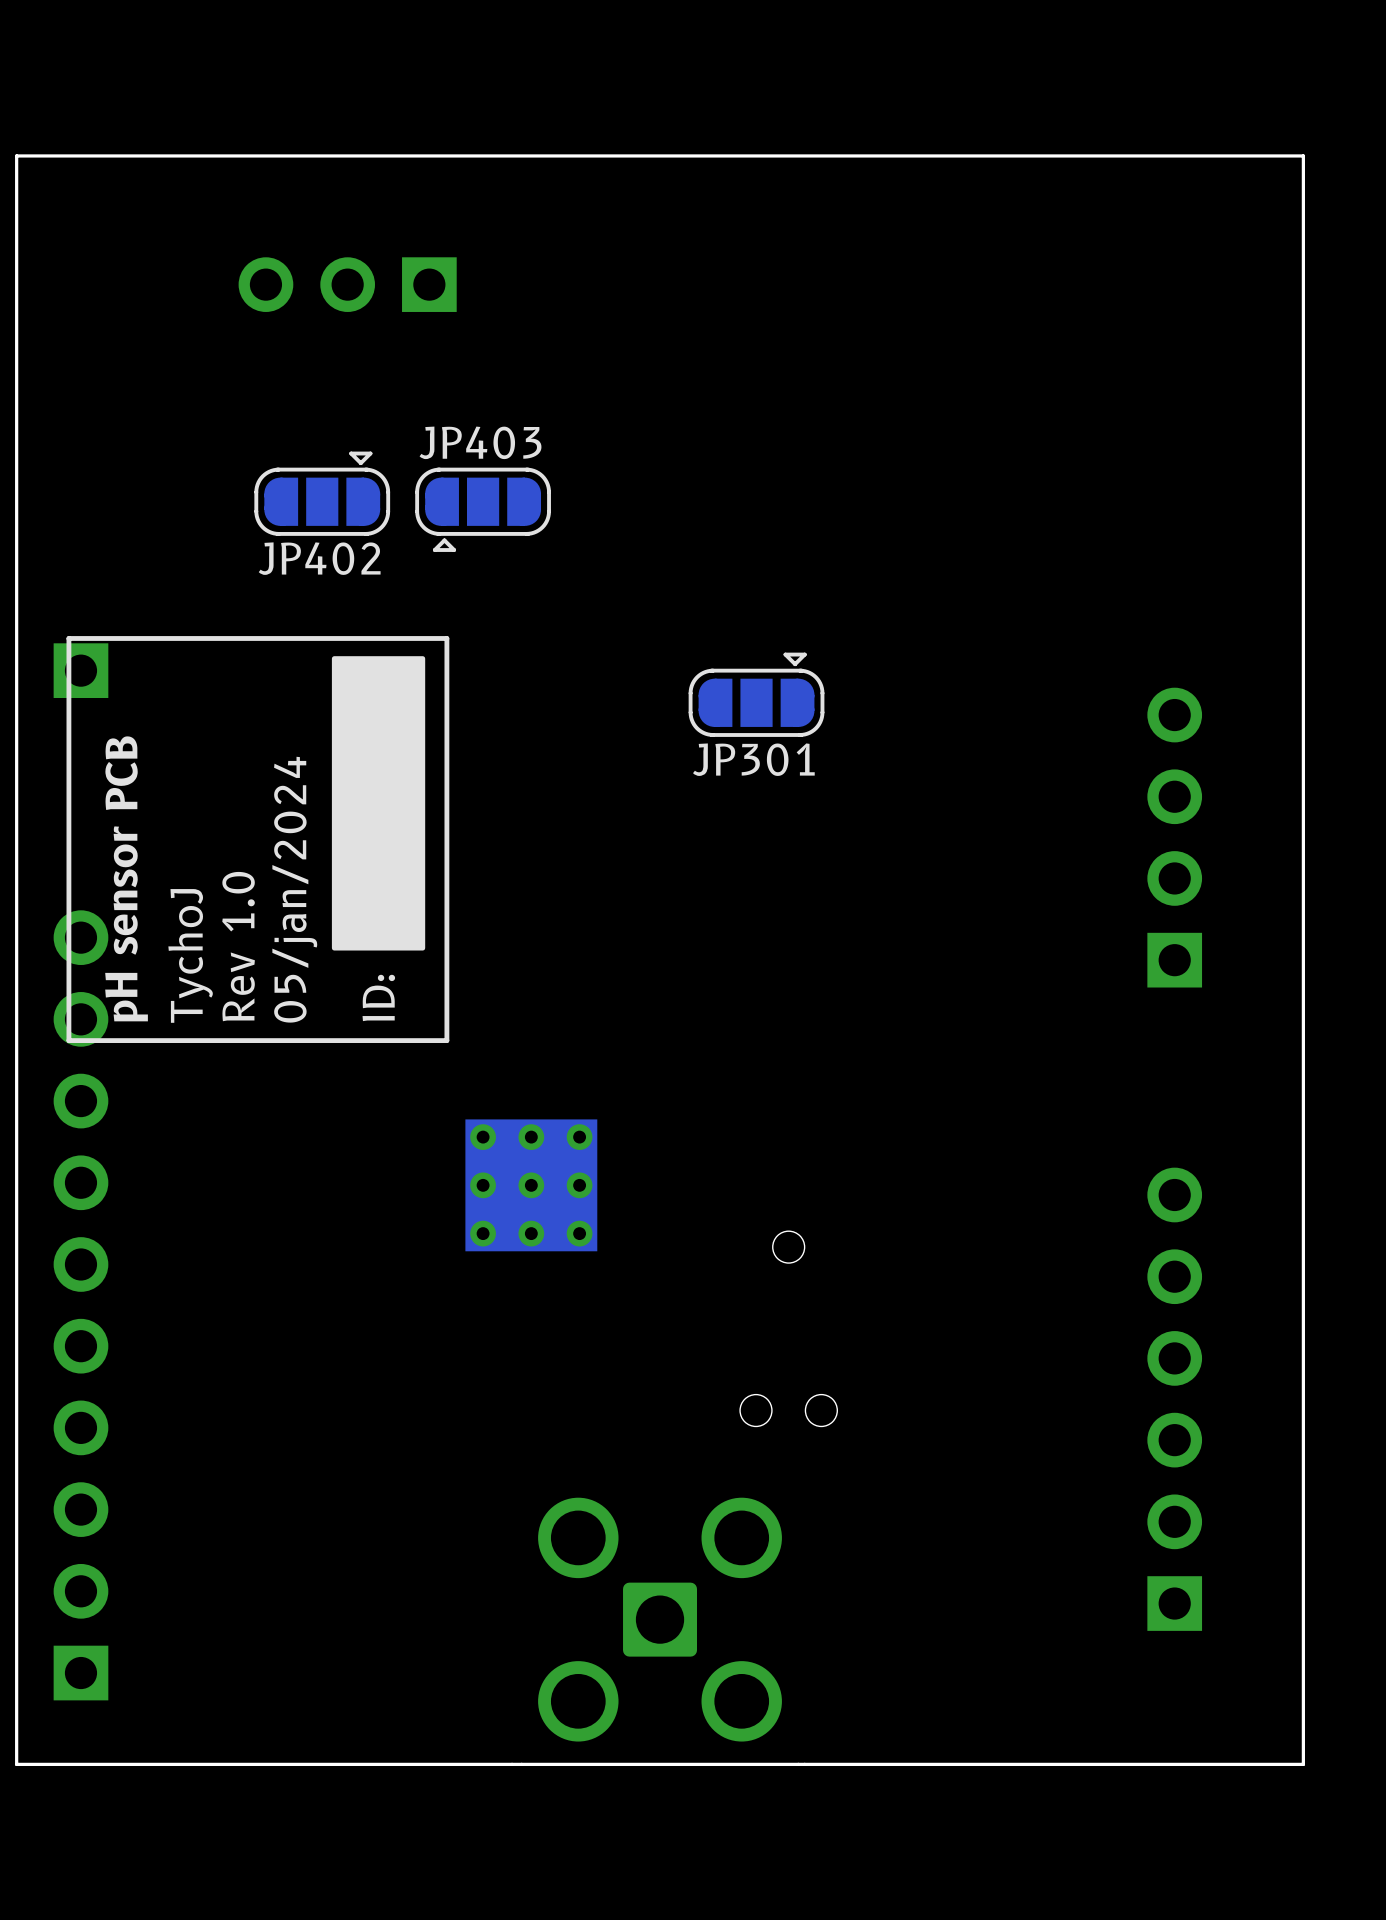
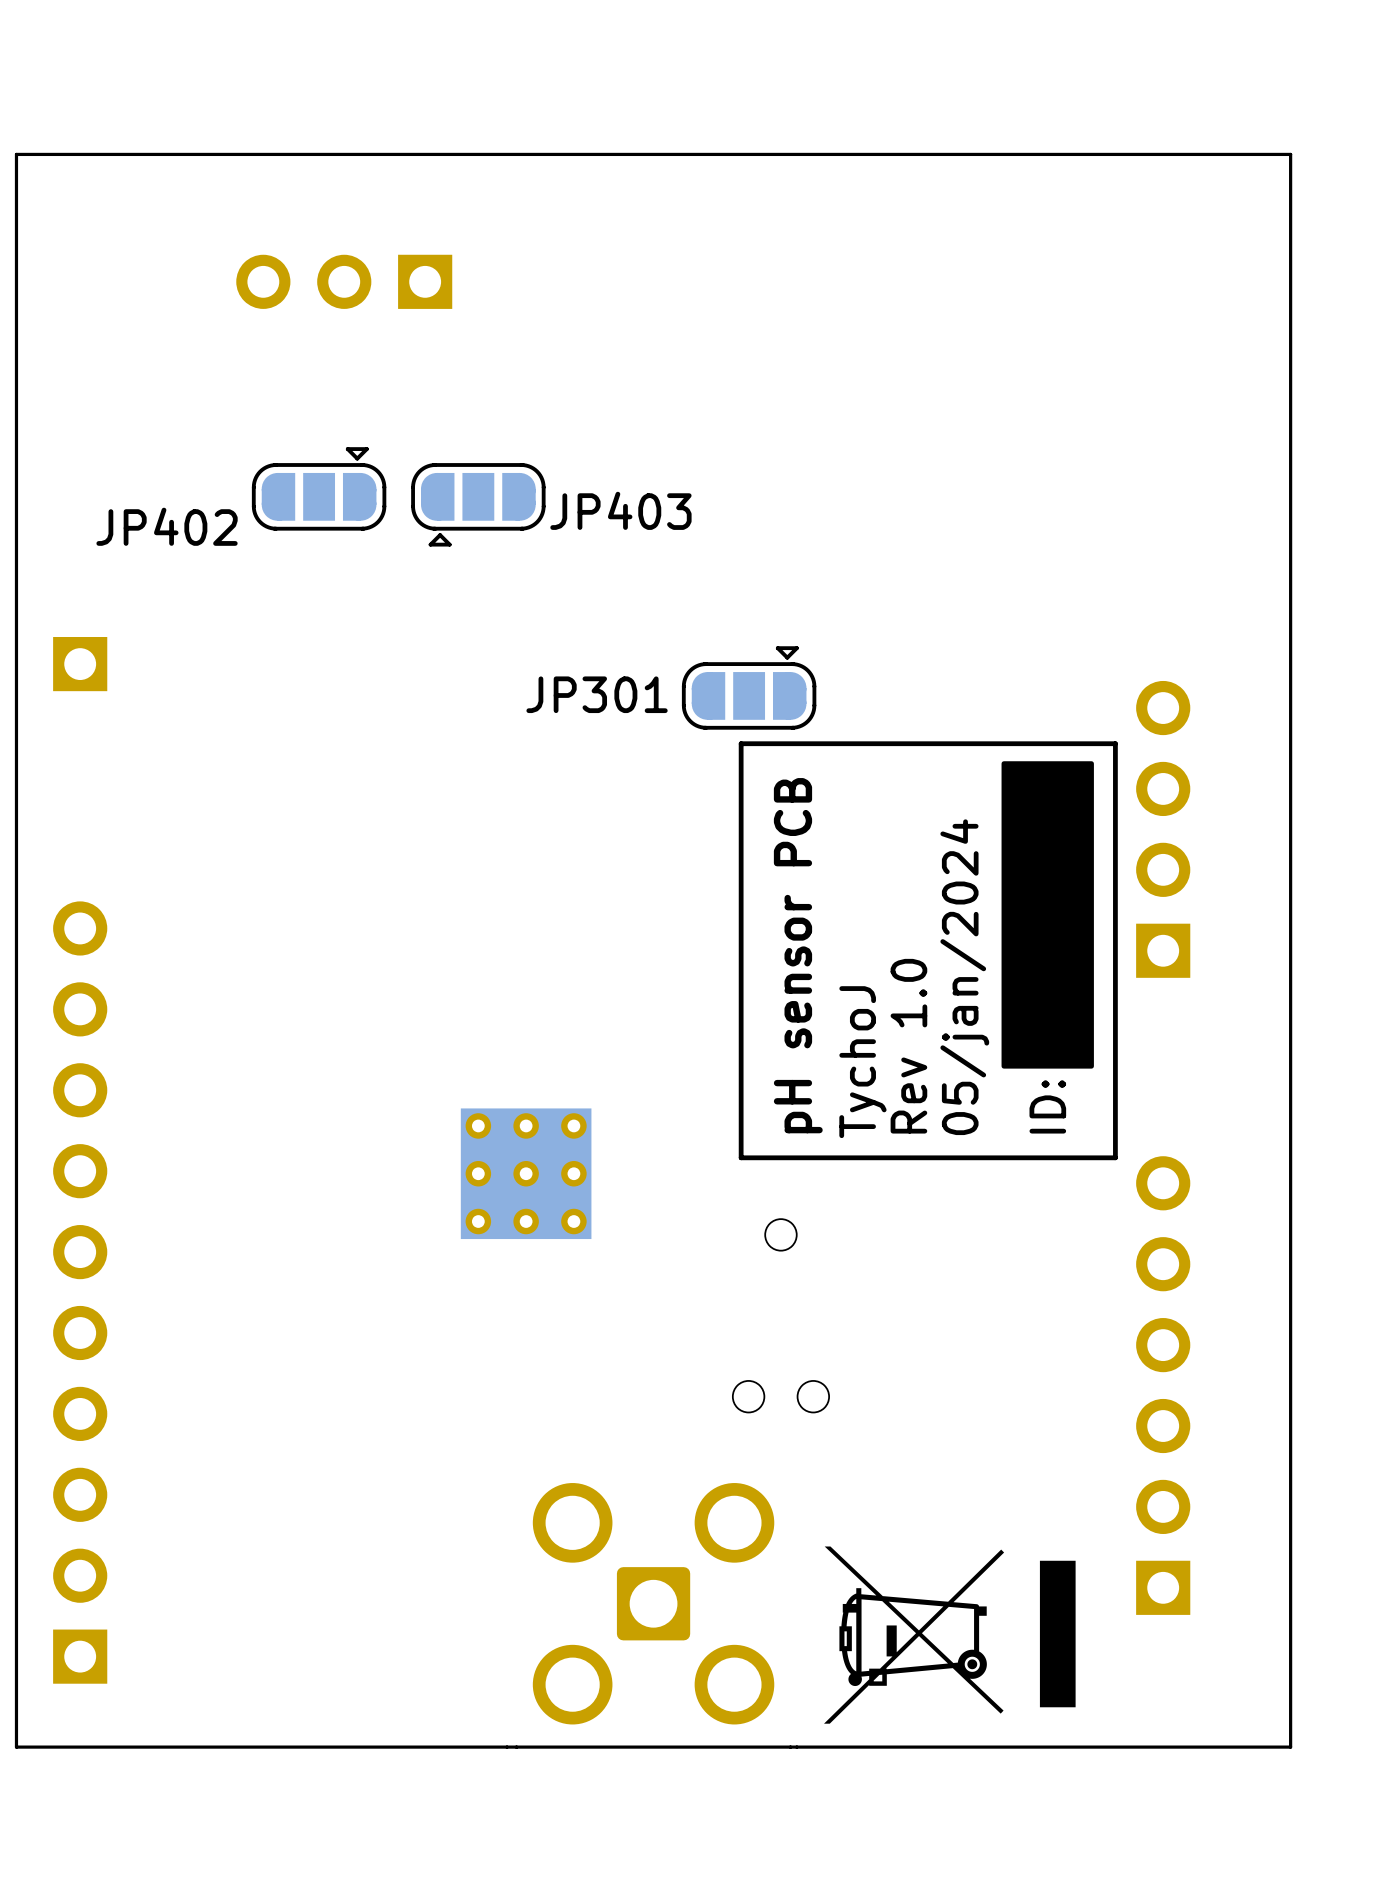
JP403 name position: JP403 (480, 442) -> JP403 (620, 510)
JP402 name position: JP402 (319, 558) -> JP402 (167, 526)
line: (446, 638) (68, 638) (68, 1040) (446, 1040) (446, 638) -> none
drawing: [331, 656, 426, 951] -> none
line: none -> (1115, 743) (741, 743) (741, 1157) (1115, 1157) (1115, 743)
JP301 name position: JP301 (753, 759) -> JP301 (597, 694)
drawing: none -> [1001, 761, 1094, 1069]
text position: pH sensor PCB (126, 878) -> pH sensor PCB (798, 955)
text position: 05/jan/2024 (294, 889) -> 05/jan/2024 (964, 977)
text position: Rev 1.0 (238, 946) -> Rev 1.0 (908, 1046)
text position: TychoJ (190, 955) -> TychoJ (862, 1062)
text position: ID: (378, 997) -> ID: (1047, 1106)
drawing: none -> [824, 1546, 1076, 1724]

